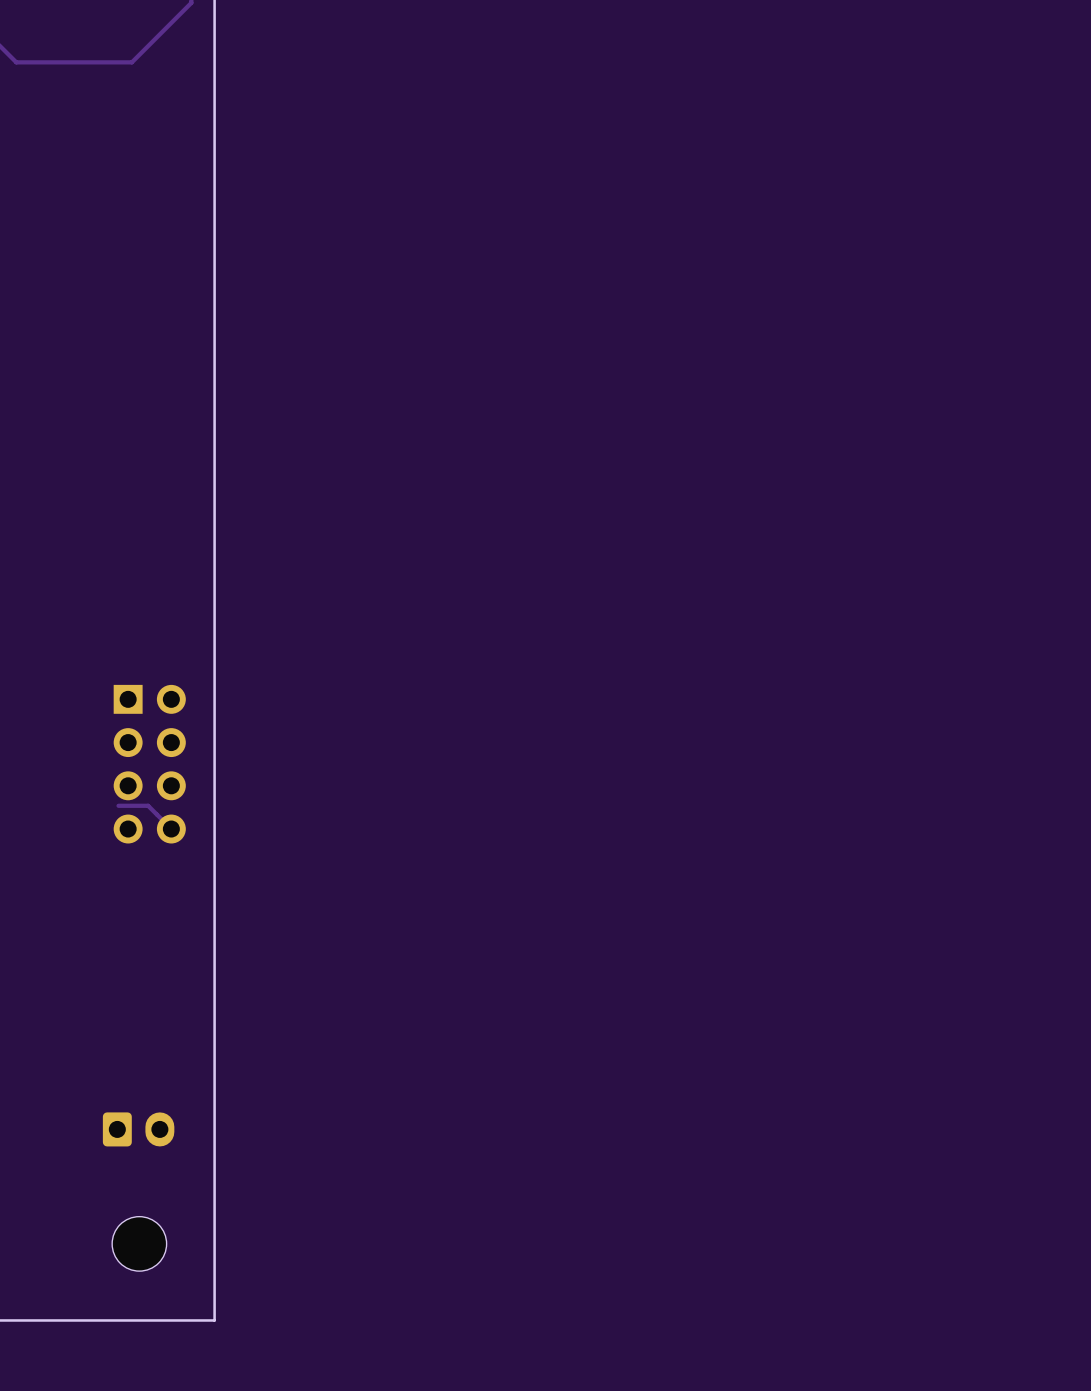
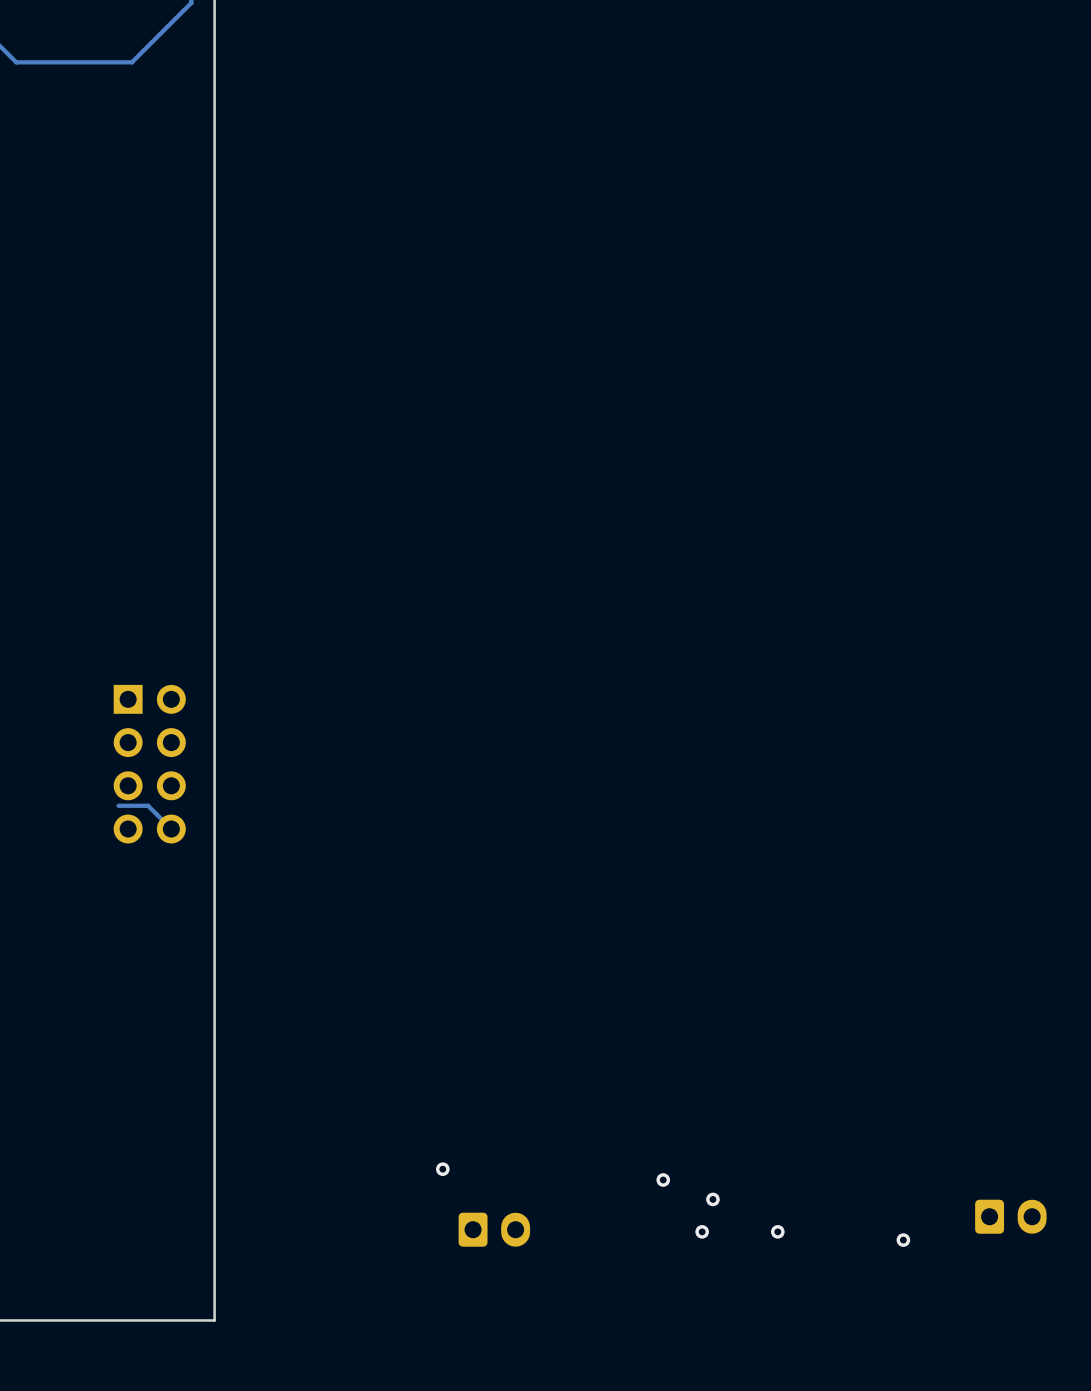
part position: (138, 1129) -> (494, 1229)
via: none -> (442, 1169)
via: none -> (663, 1179)
via: none -> (712, 1199)
part: none -> (1010, 1216)
via: none -> (702, 1231)
via: none -> (777, 1231)
via: none -> (903, 1240)
part: (139, 1243) -> none

